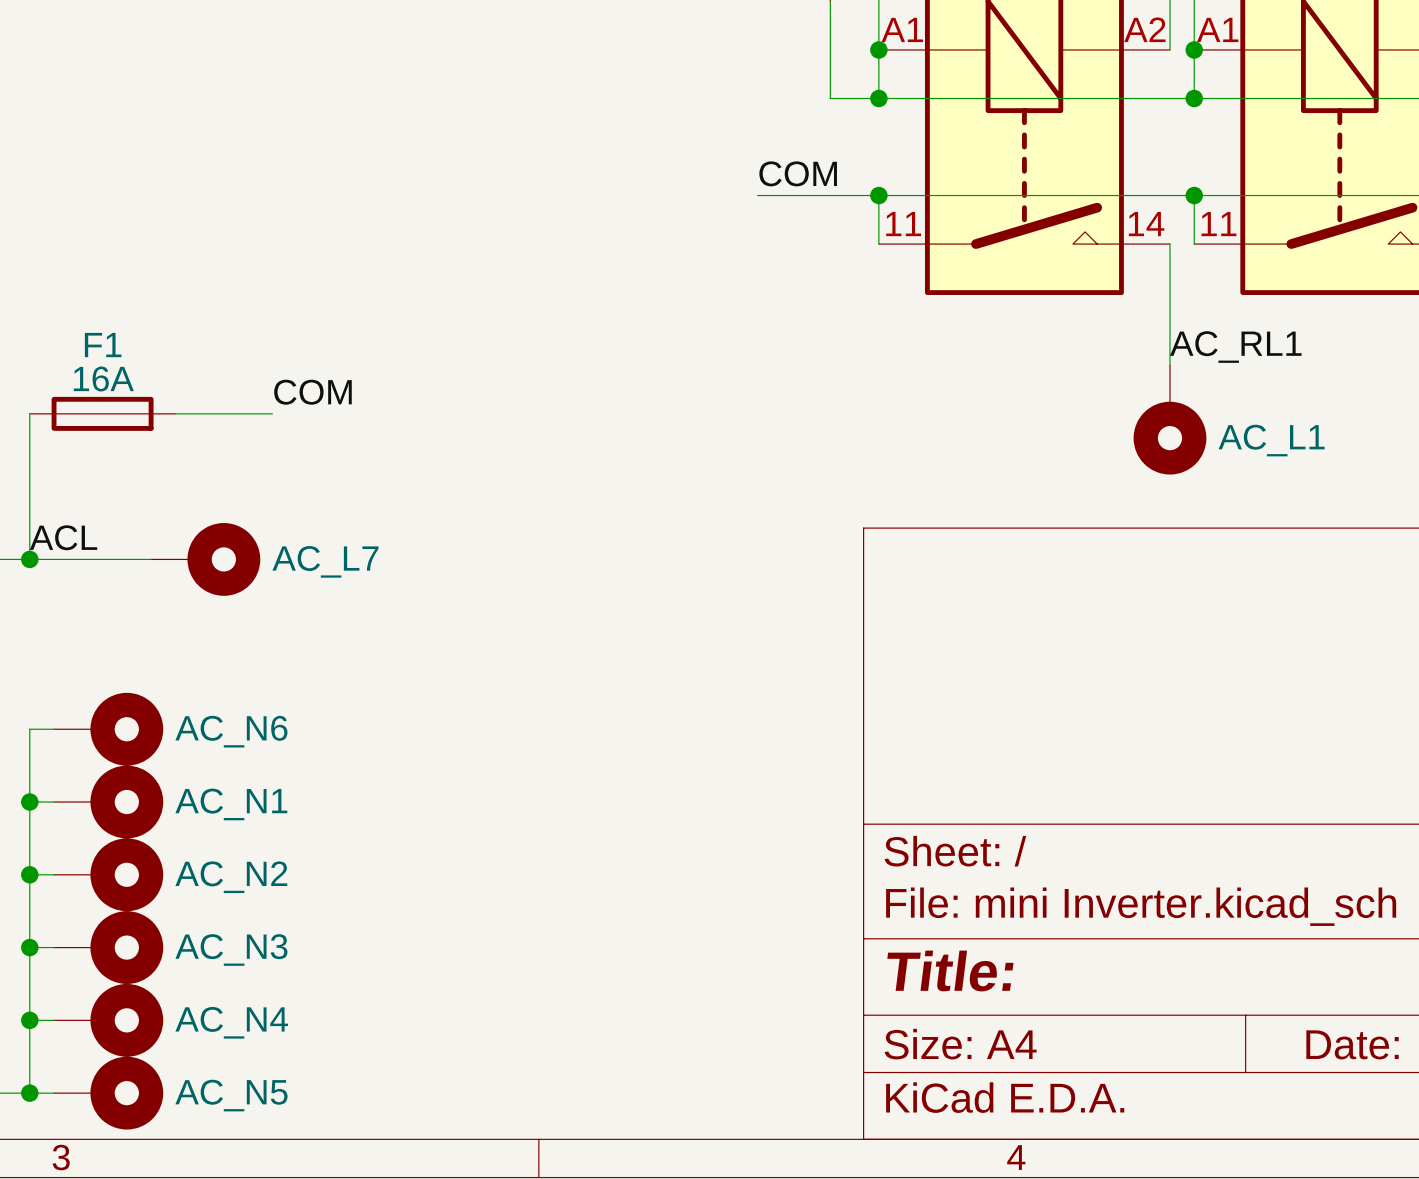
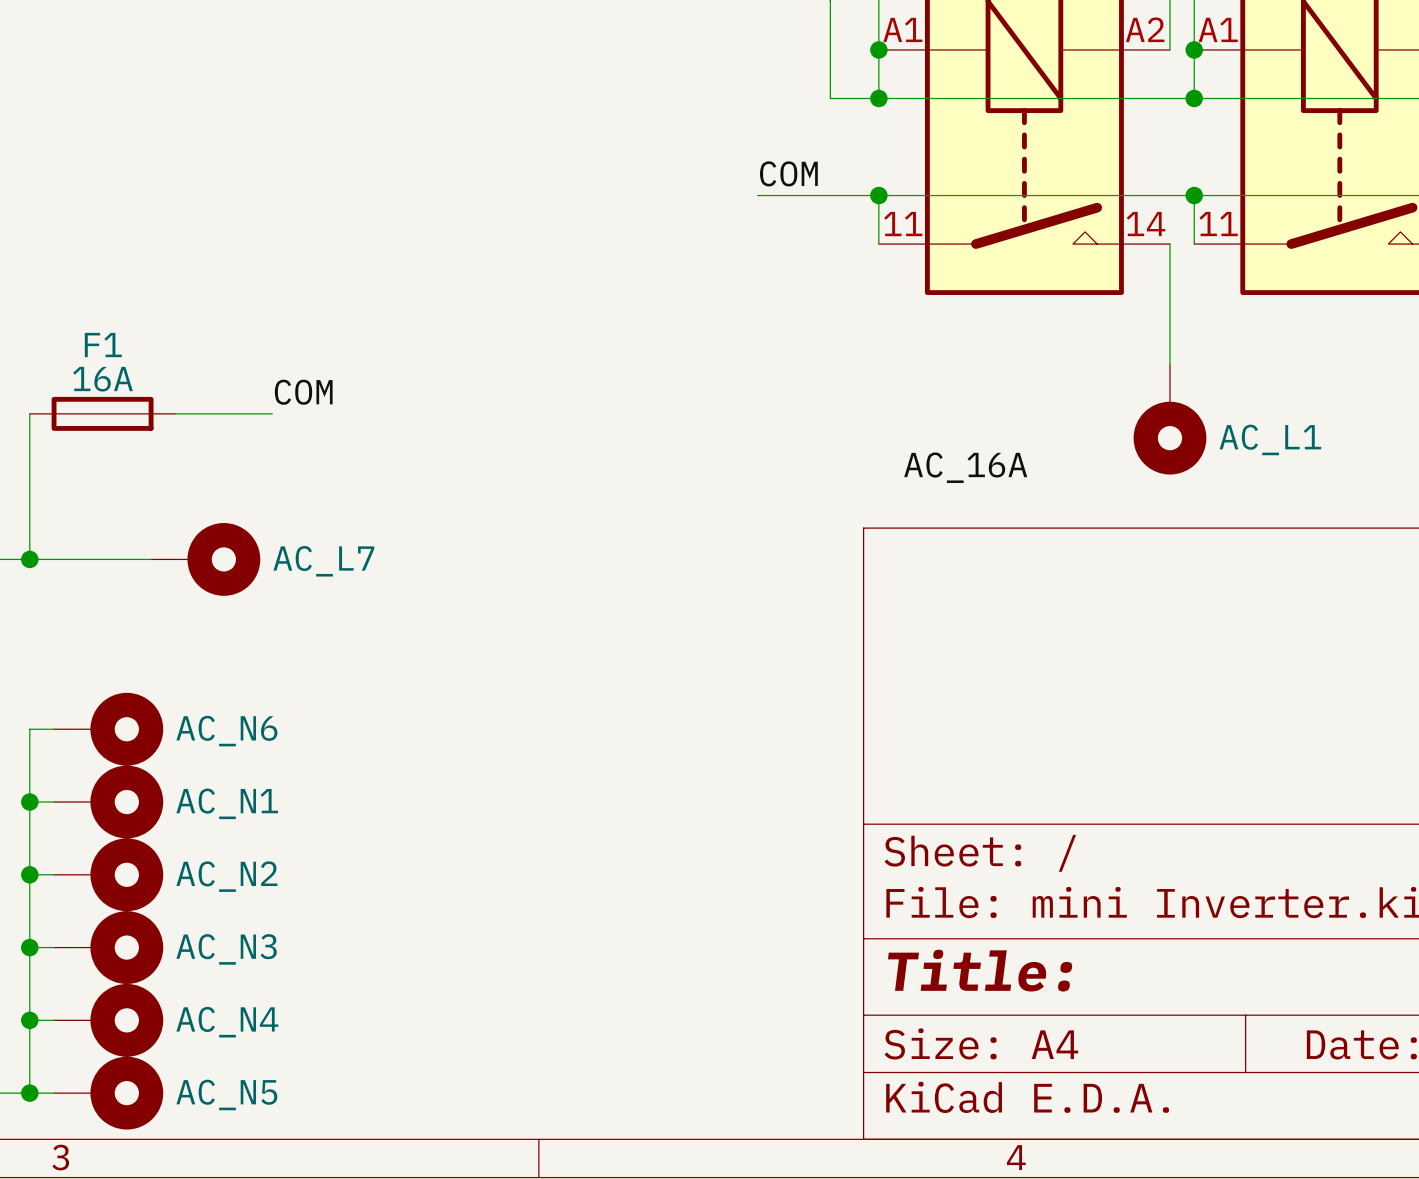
label: AC_RL1 (1235, 347) -> none
label: none -> AC_16A (965, 467)
label: ACL (63, 537) -> none

